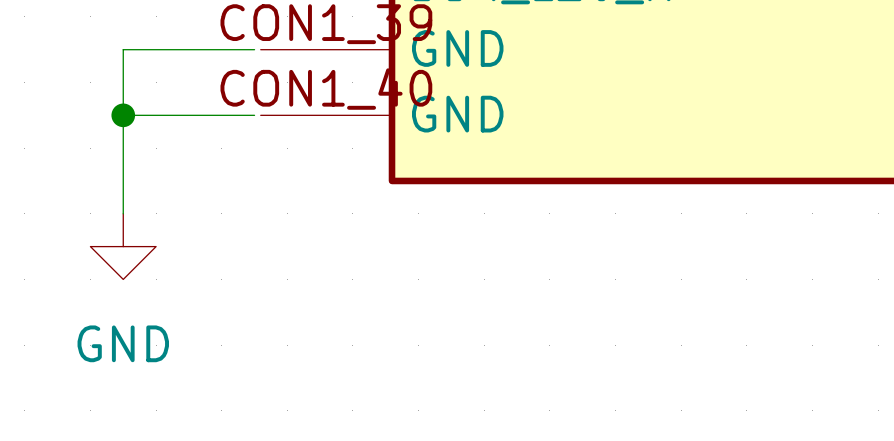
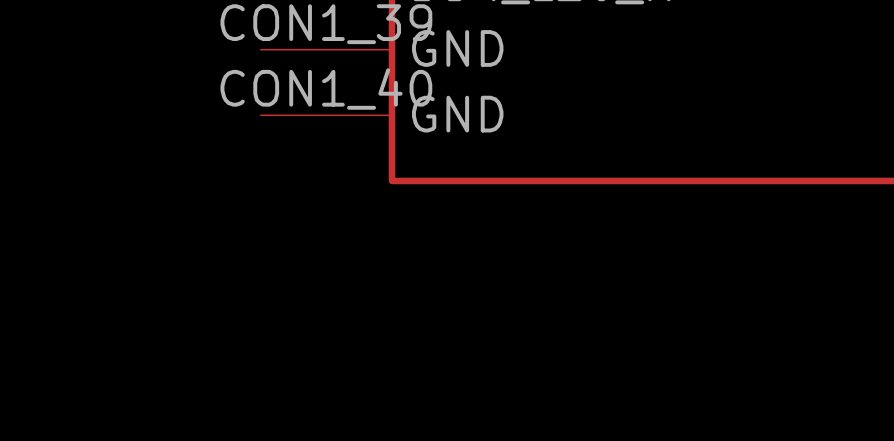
wire: (254, 49) (123, 49) (123, 213) -> none
wire: (123, 115) (254, 115) -> none
junction: (123, 115) -> none
power symbol: GND (123, 246) -> none

